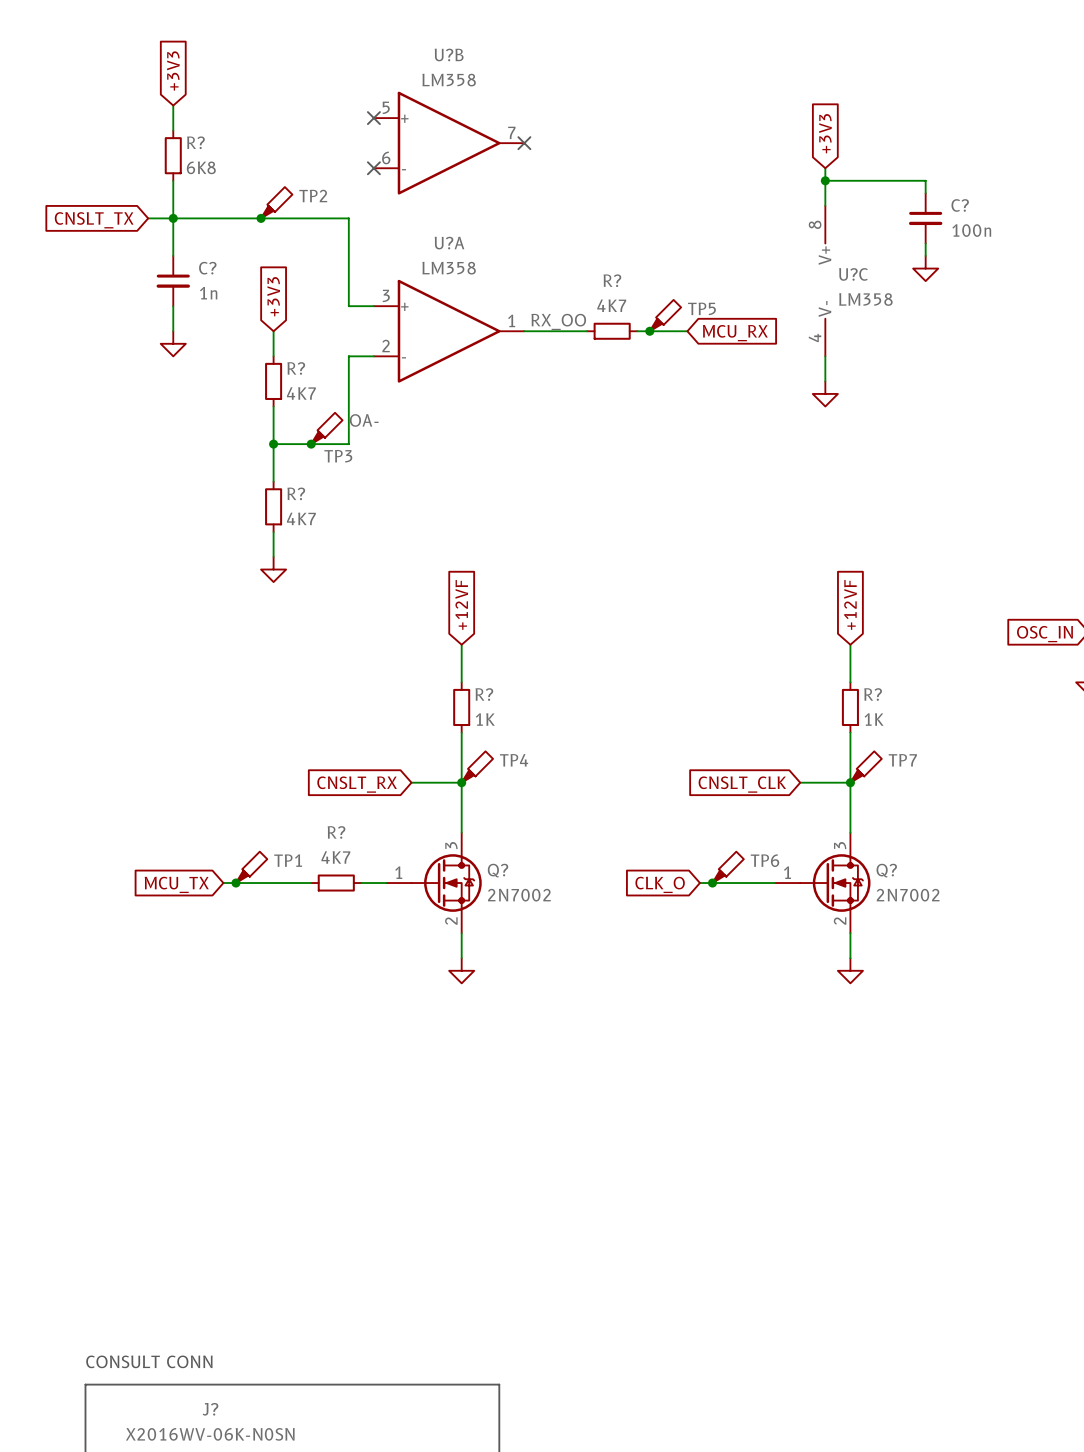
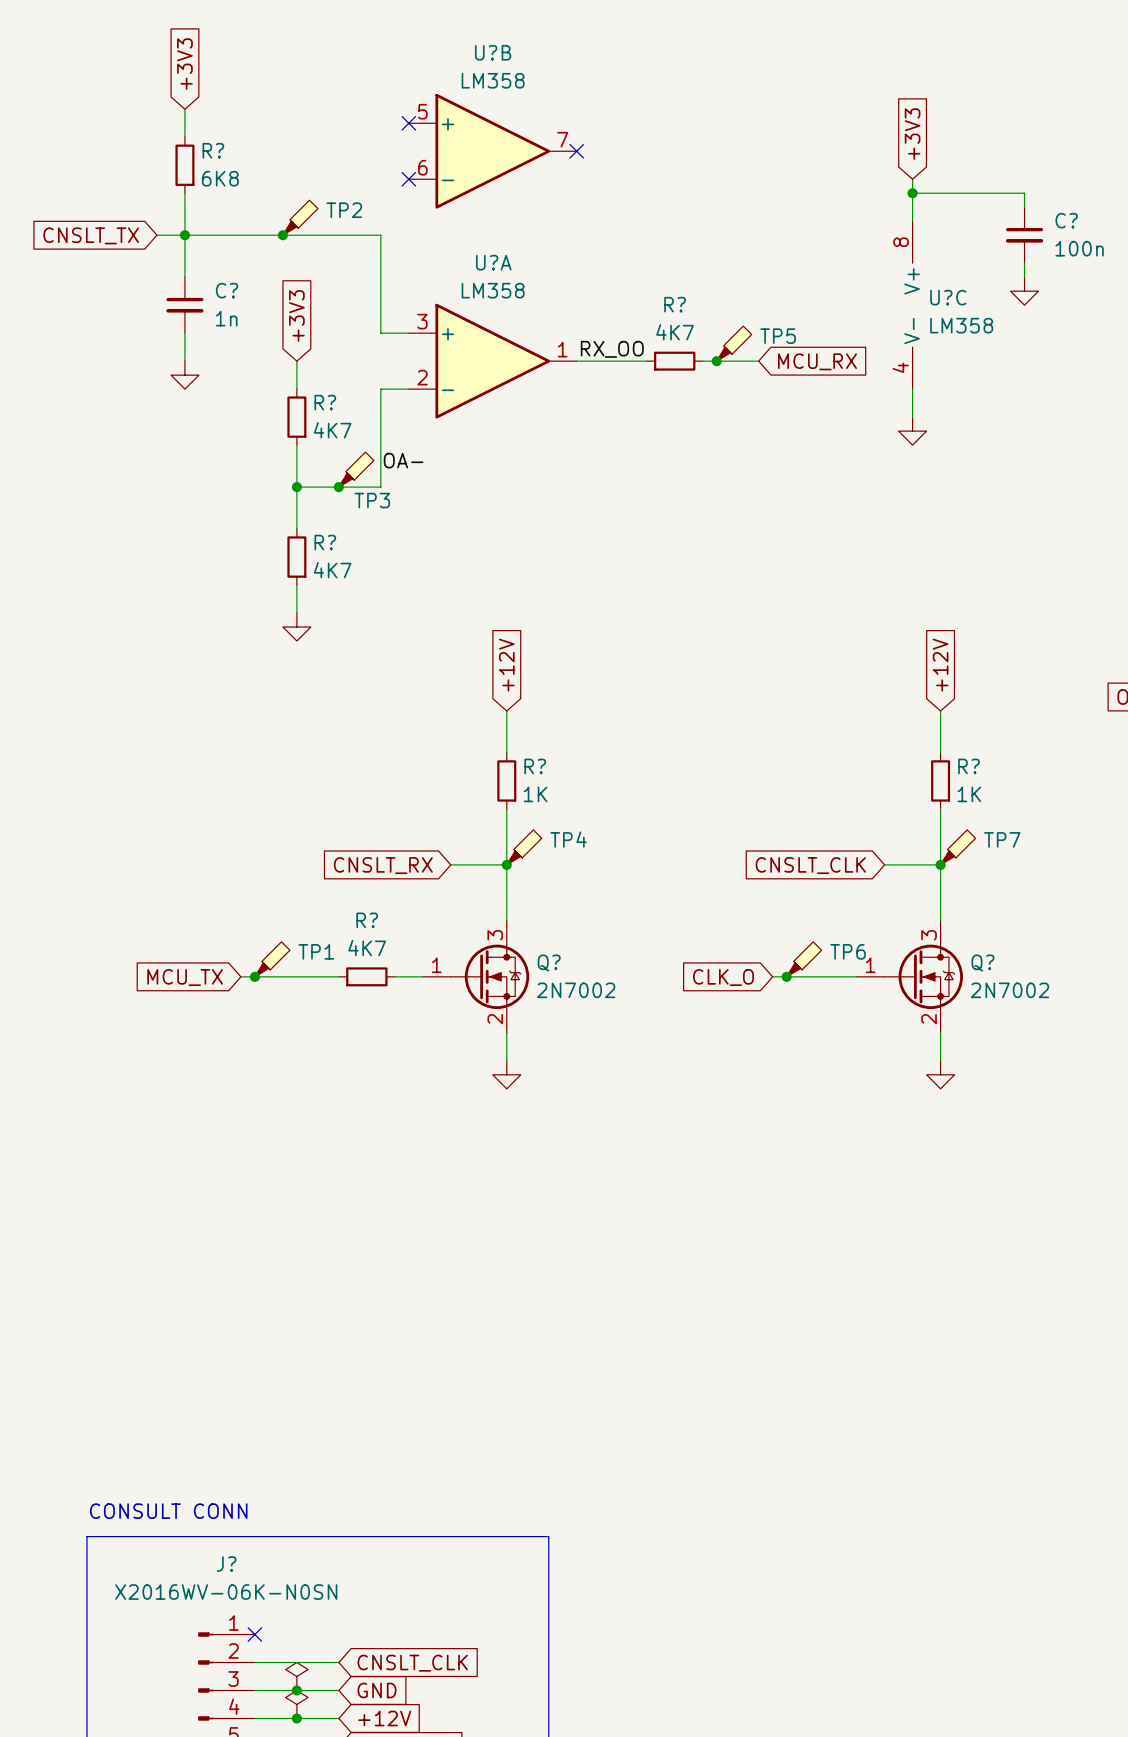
global label: +12VF (461, 604) -> +12V (506, 665)
global label: +12VF (850, 604) -> +12V (940, 665)

